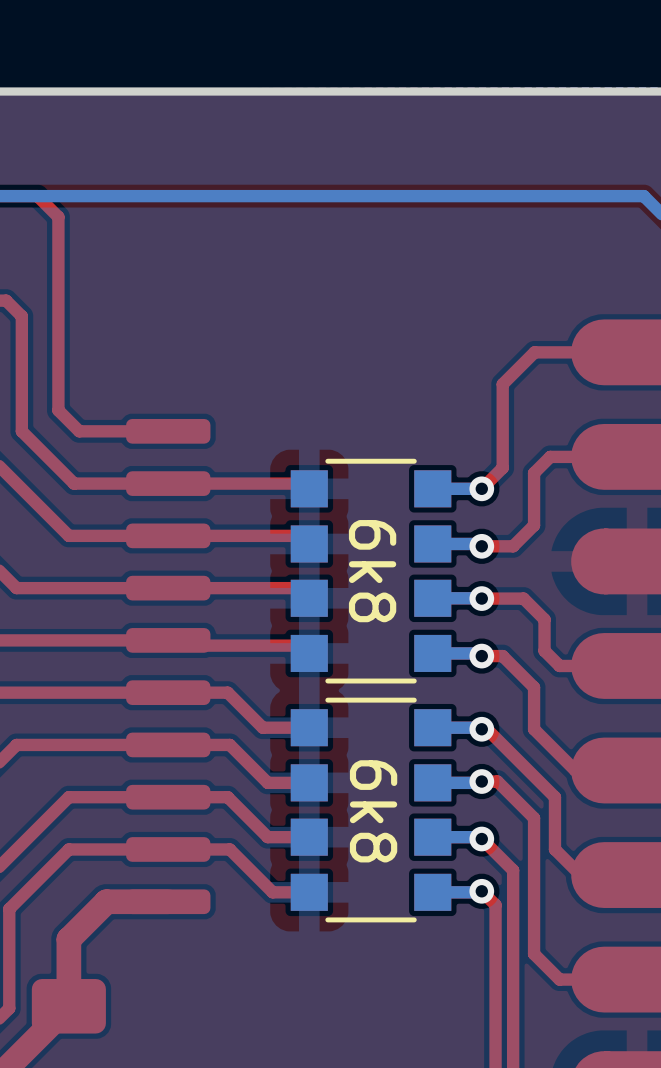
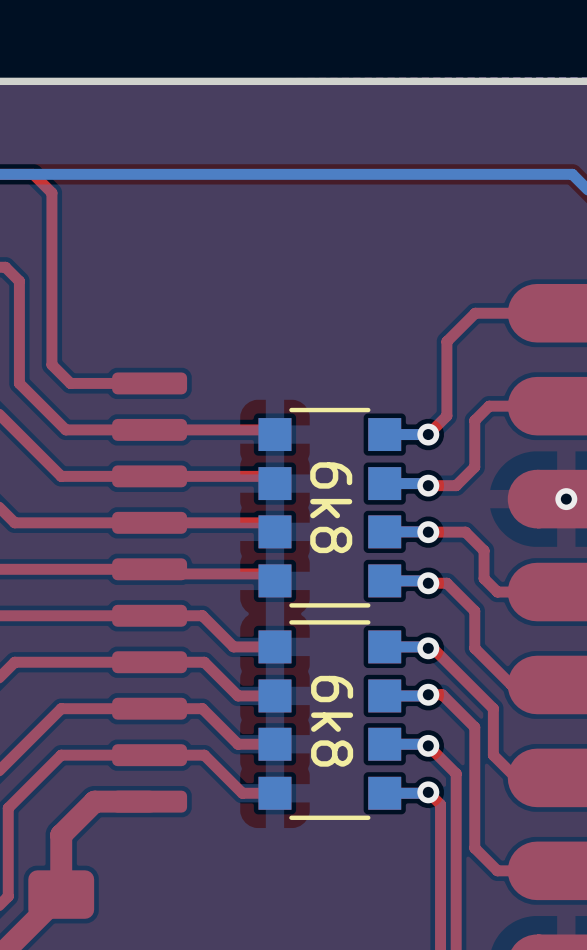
via: none -> (566, 499)

